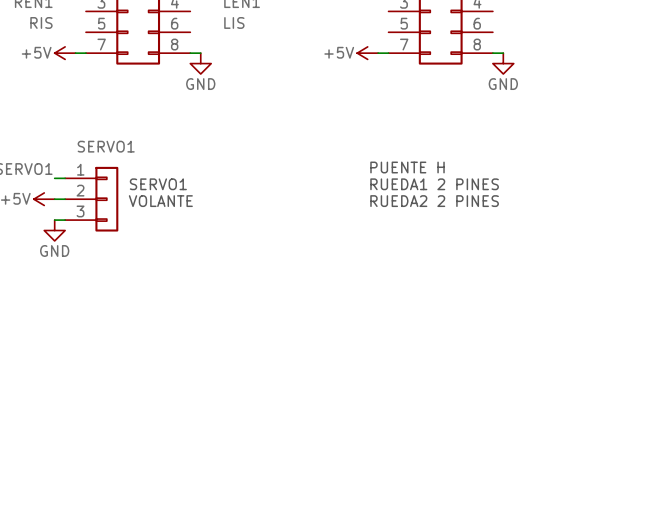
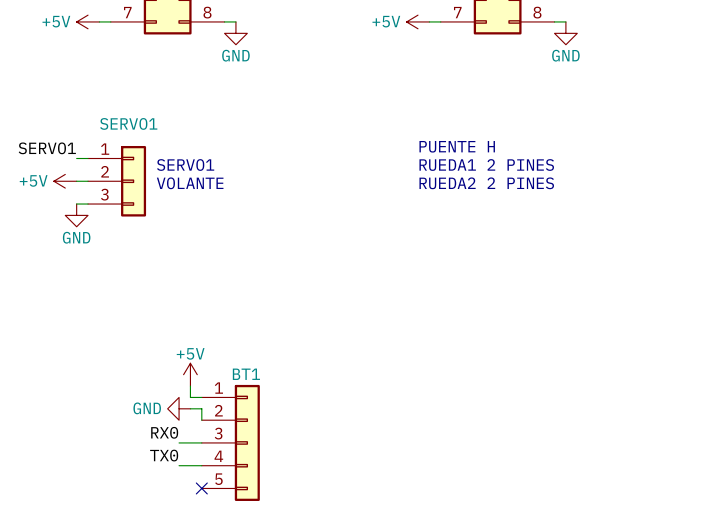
power symbol: none -> +5V (190, 374)
wire: none -> (190, 386) (190, 397) (201, 397)
power symbol: none -> GND (179, 408)
wire: none -> (190, 408) (201, 408) (201, 420)
label: none -> RX0 (164, 432)
wire: none -> (179, 442) (201, 442)
BT1: none -> (230, 442)
label: none -> TX0 (164, 455)
wire: none -> (179, 465) (201, 465)
no-connect mark: none -> (201, 488)

